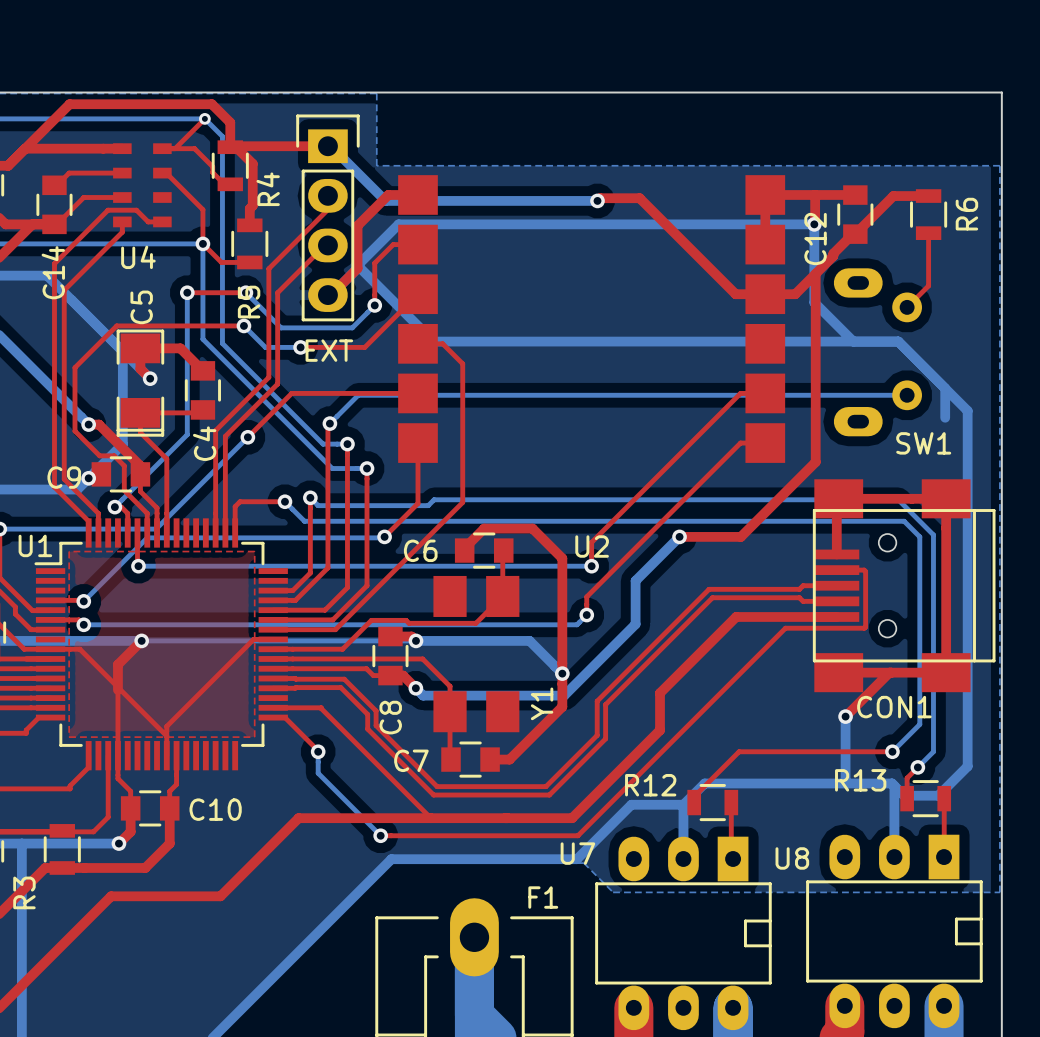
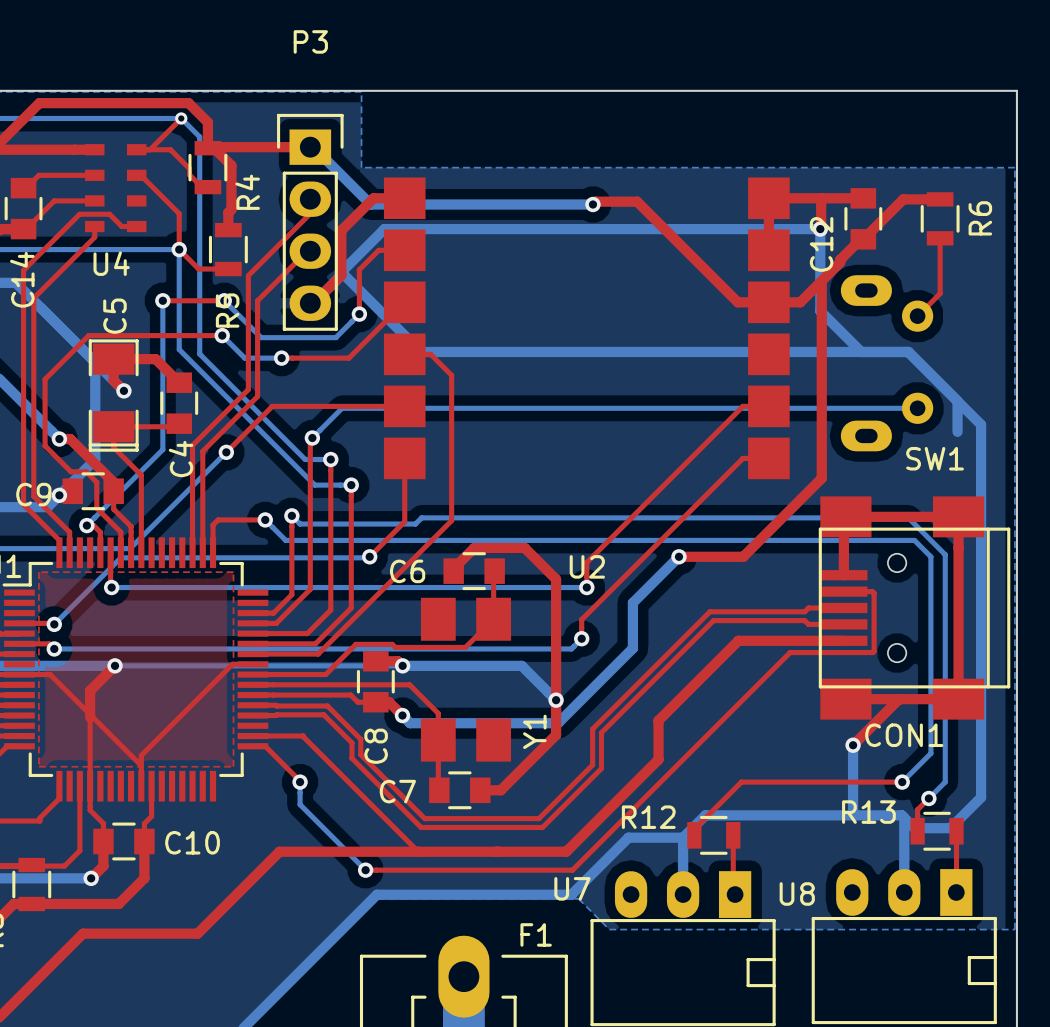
P3 name: none -> P3 (310, 41)
P3 value: EXT (329, 350) -> none

